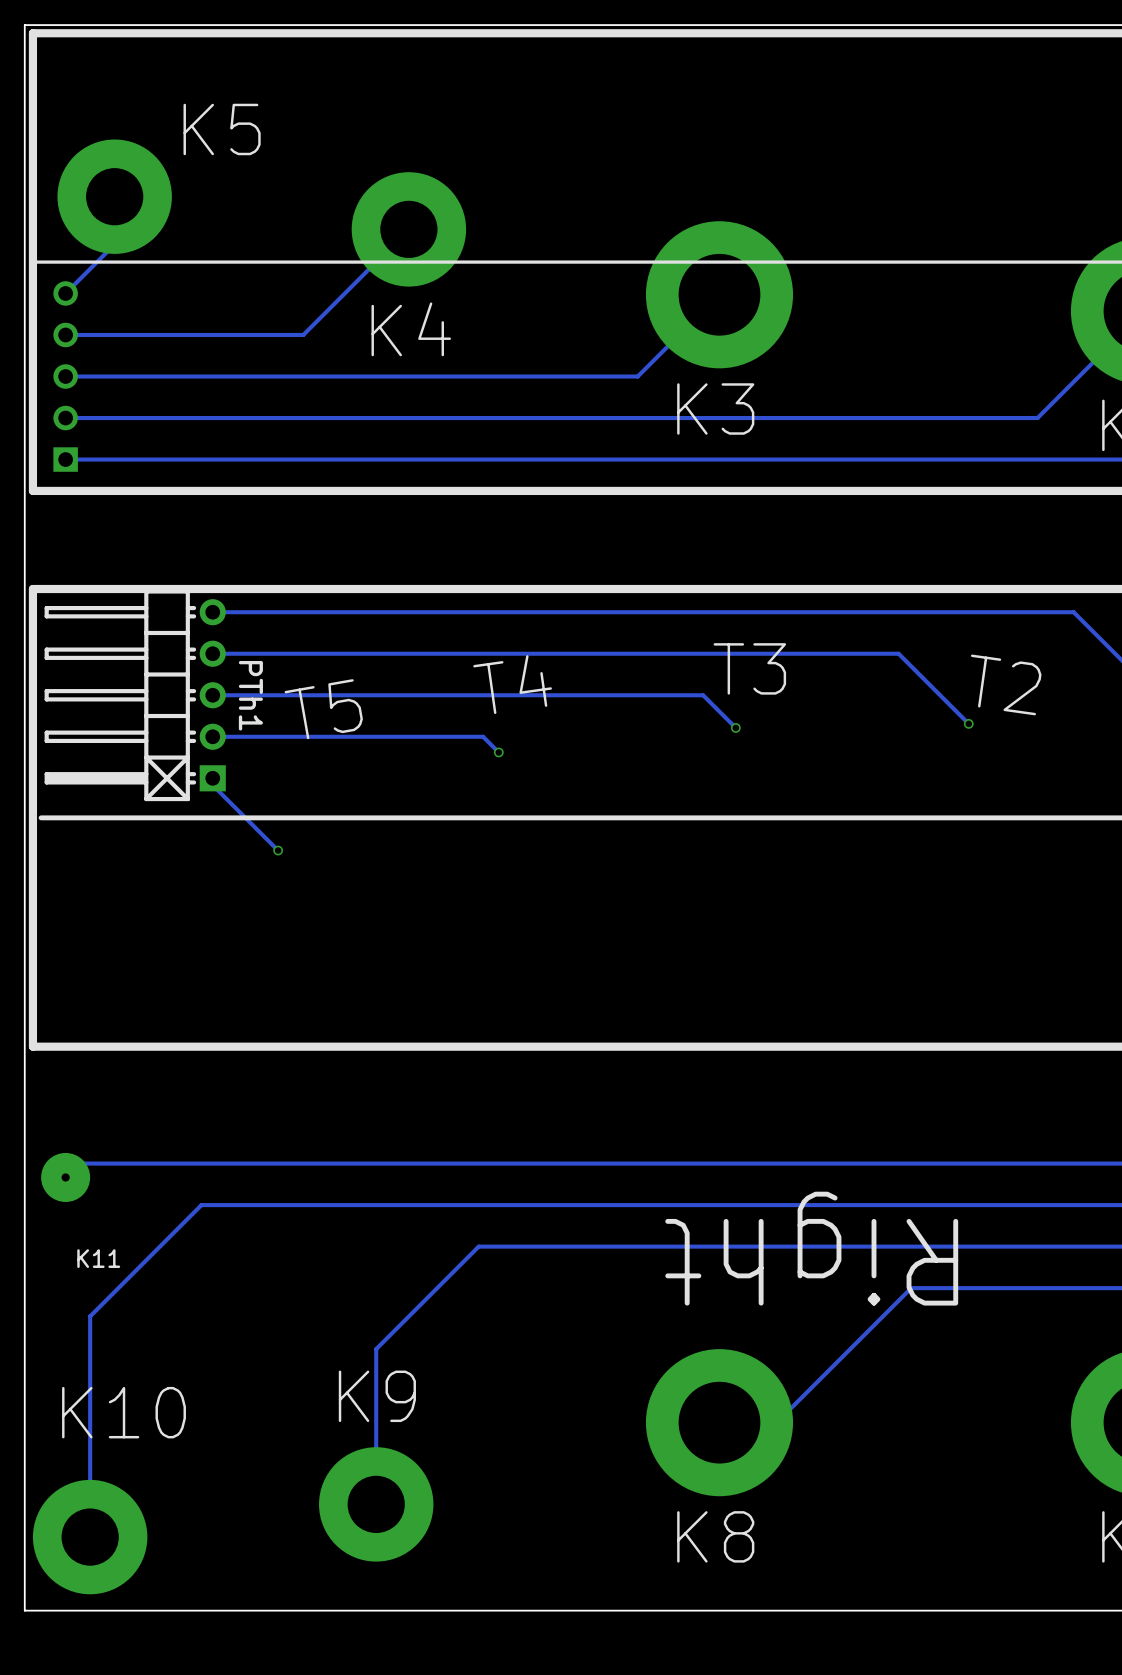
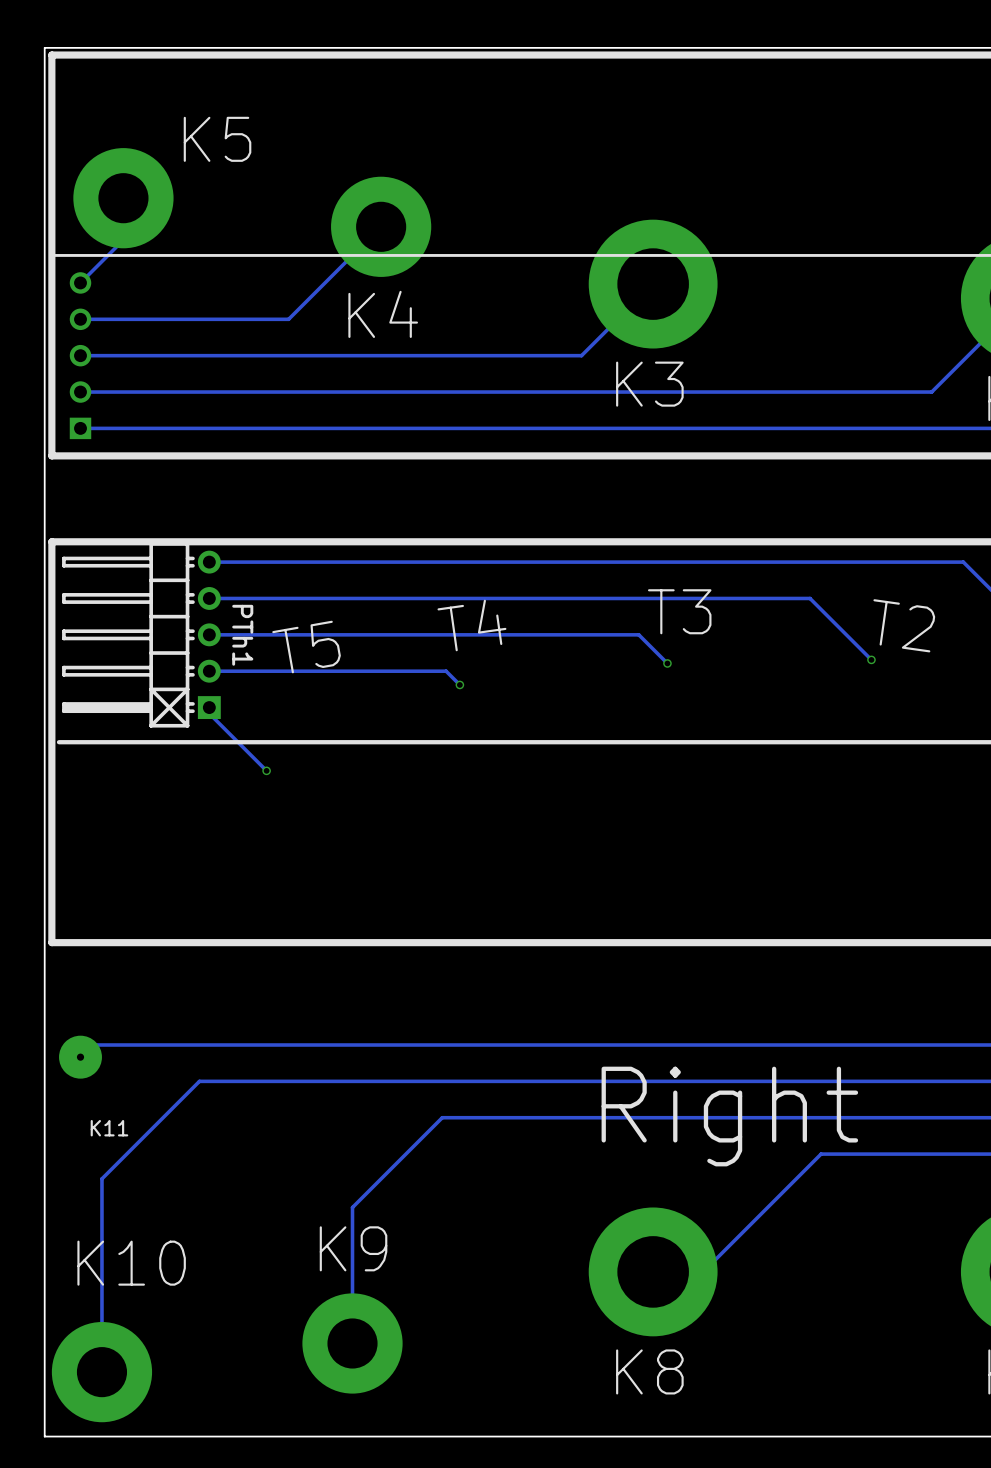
text rotation: 0° (811, 1248) -> 180° (729, 1116)

